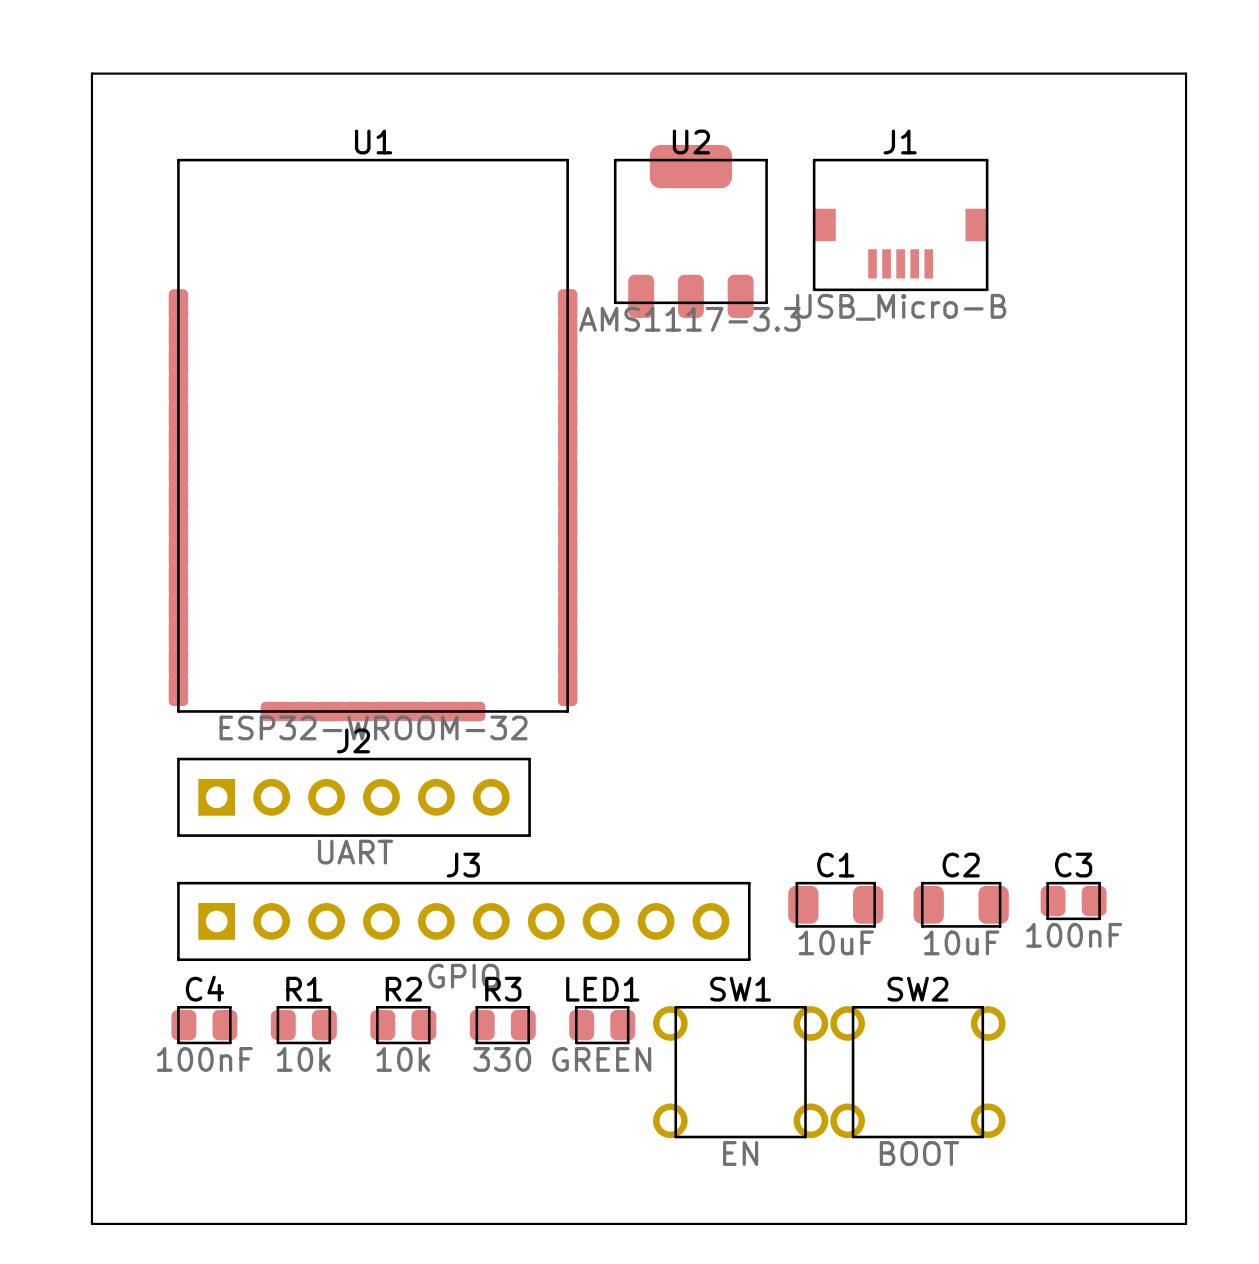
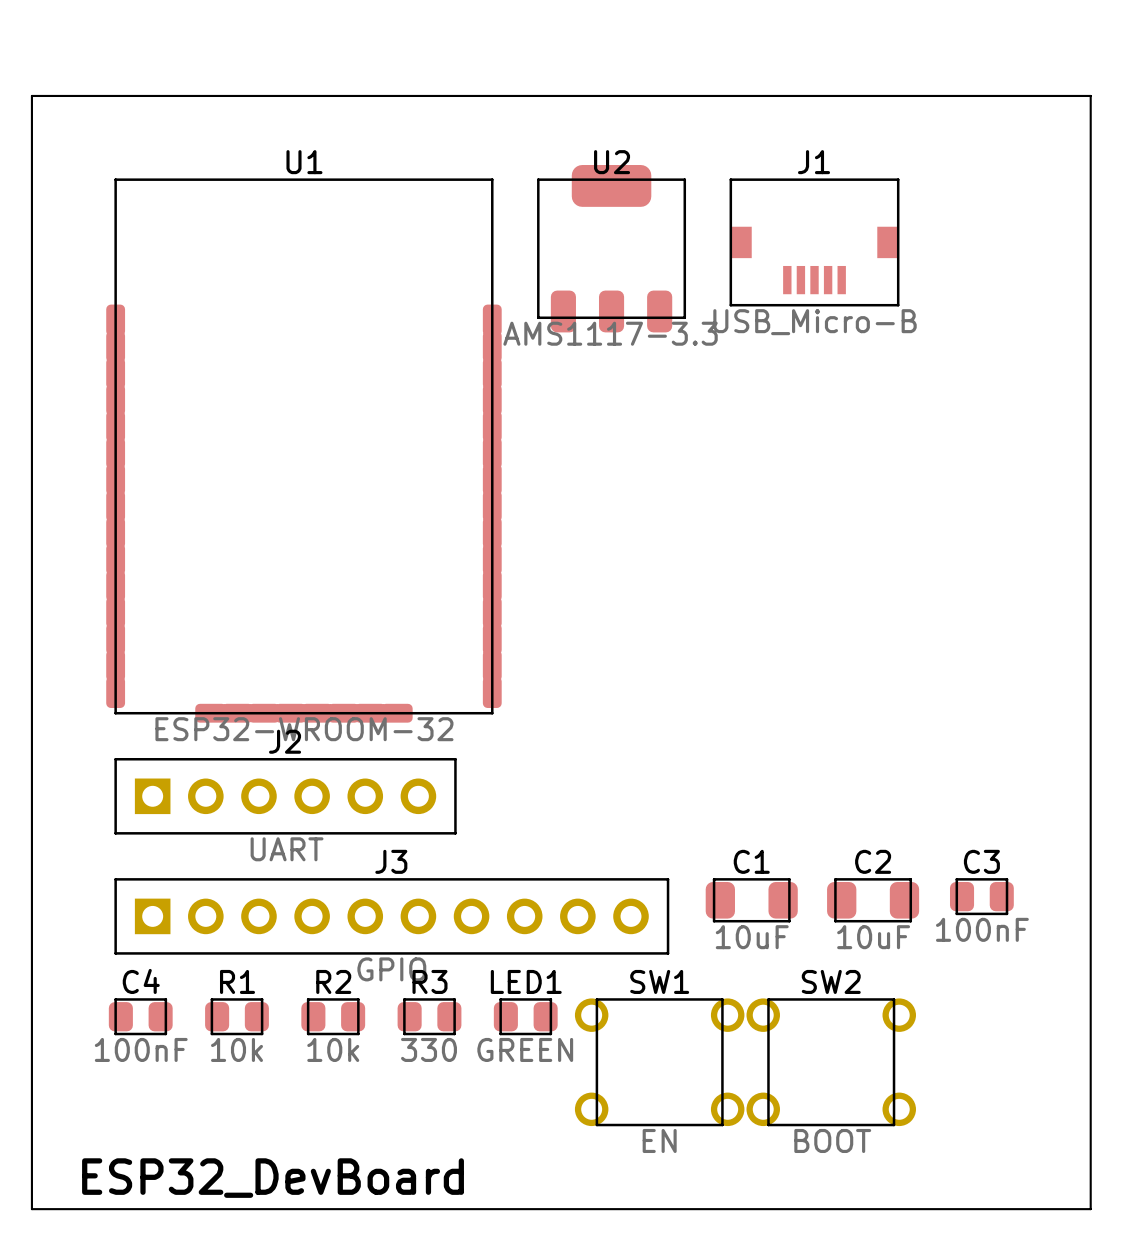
text: none -> ESP32_DevBoard (273, 1178)

